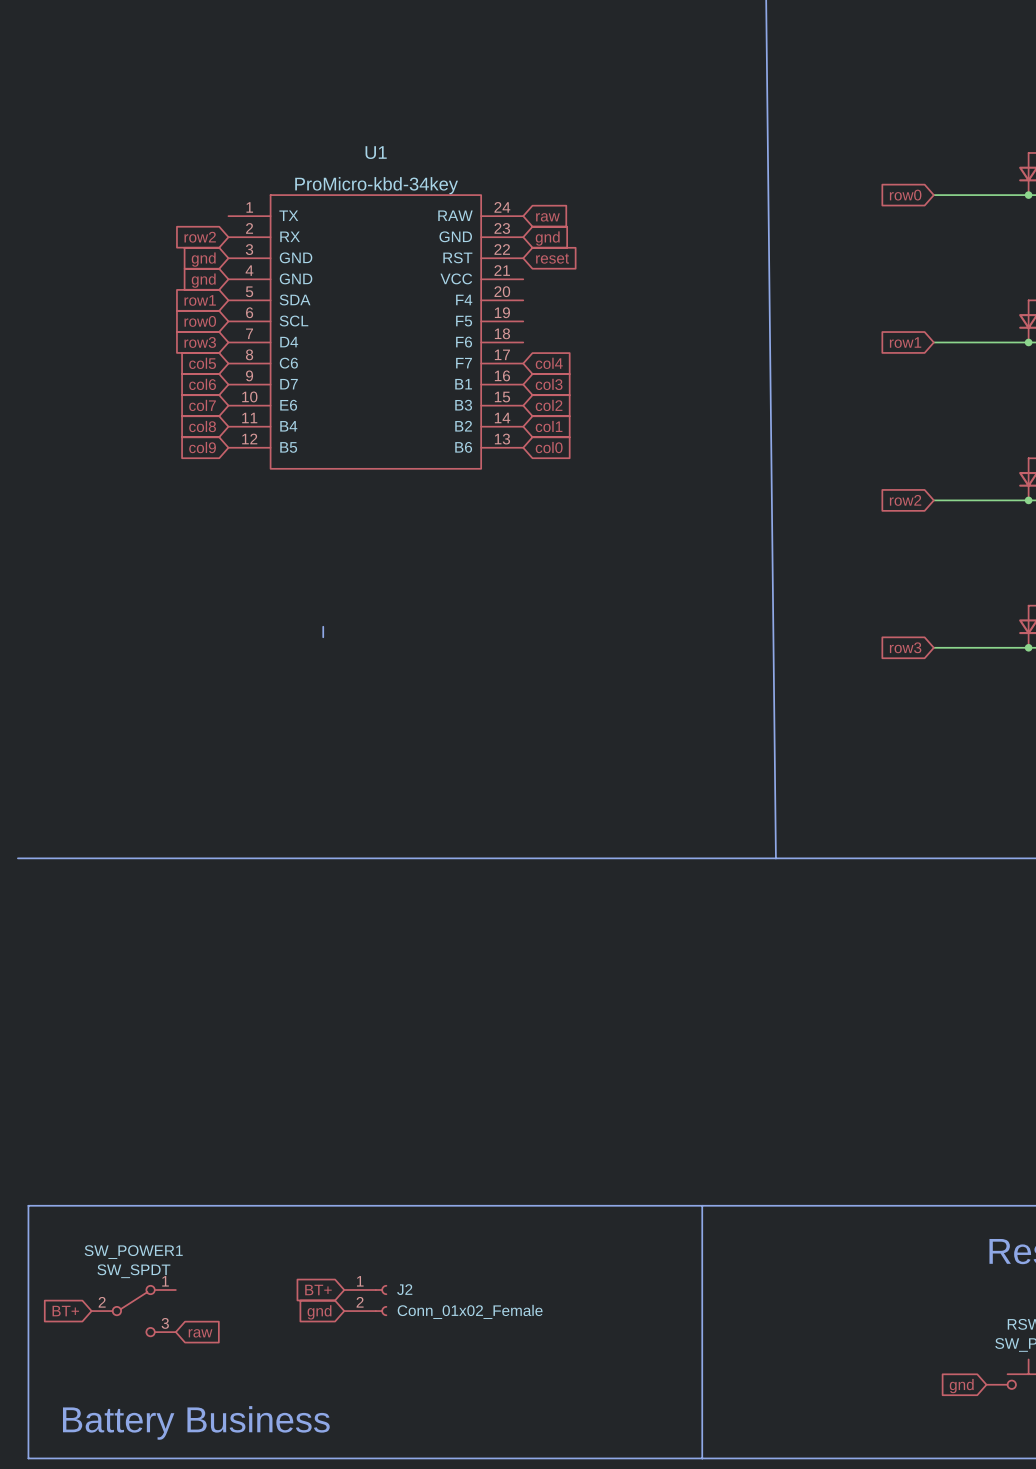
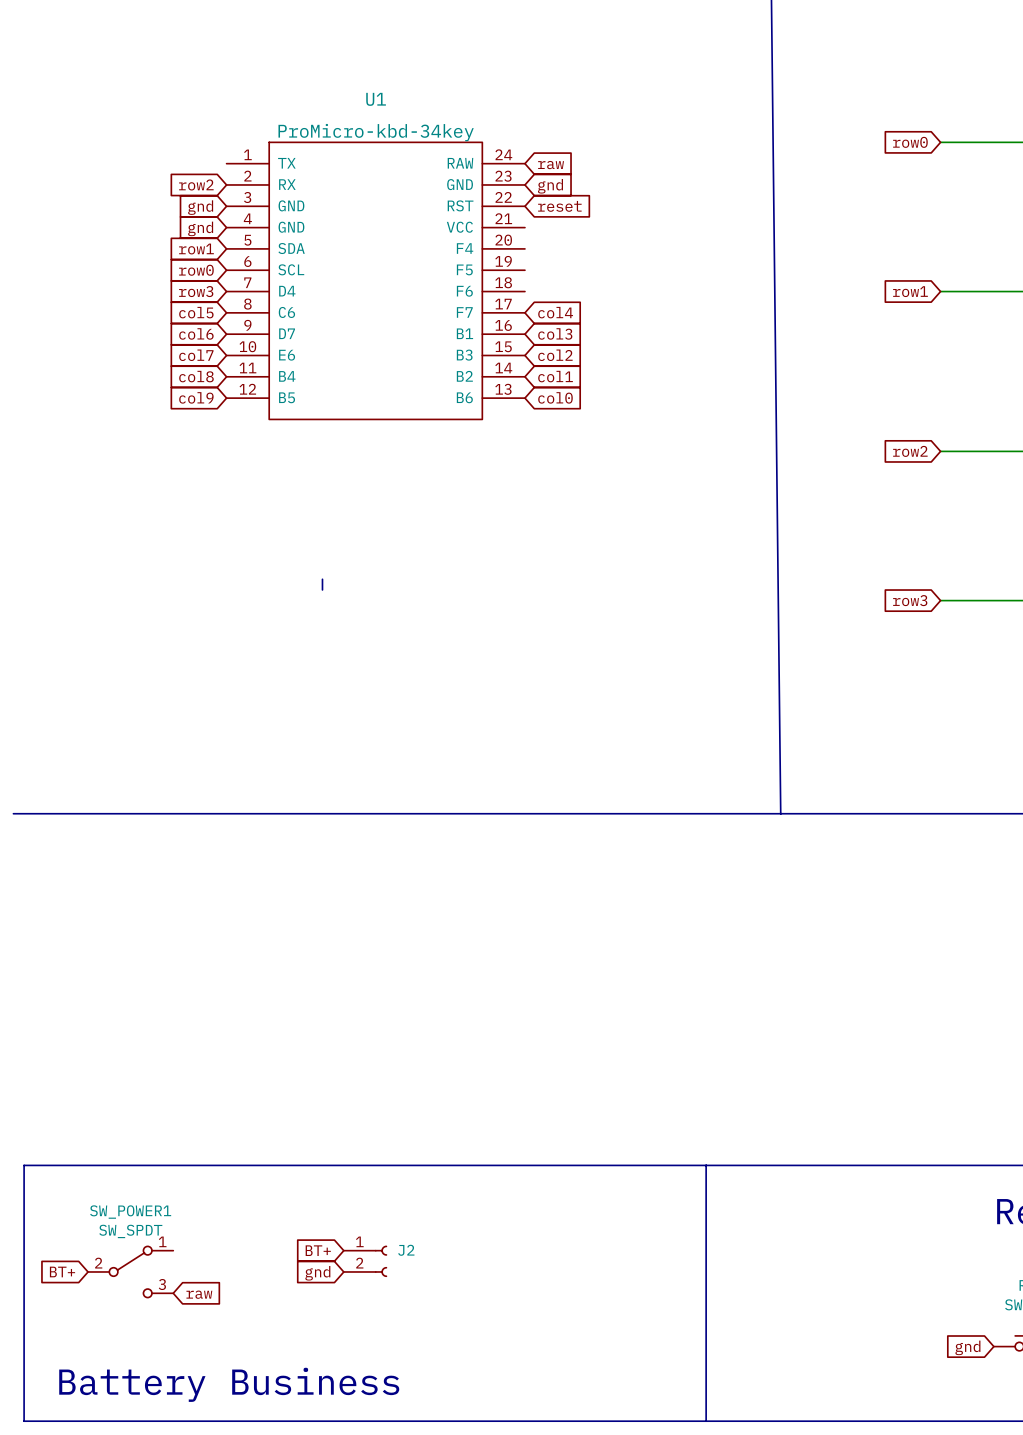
J2 value: Conn_01x02_Female (470, 1311) -> none

